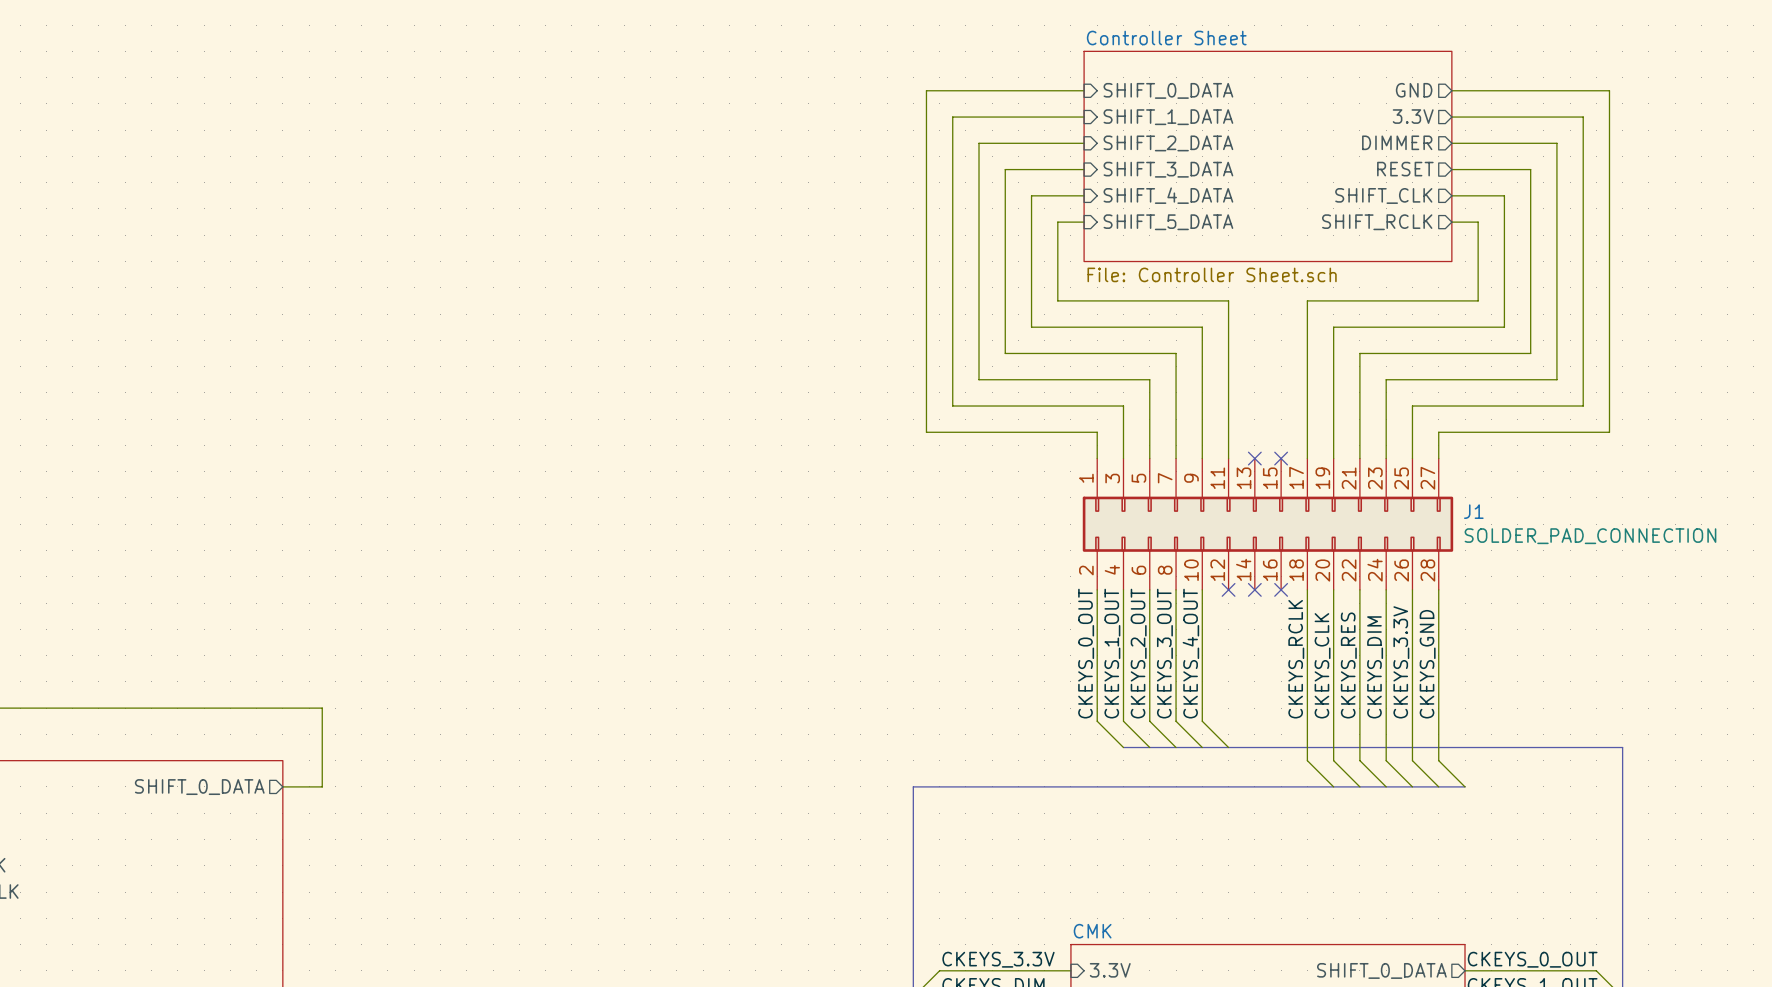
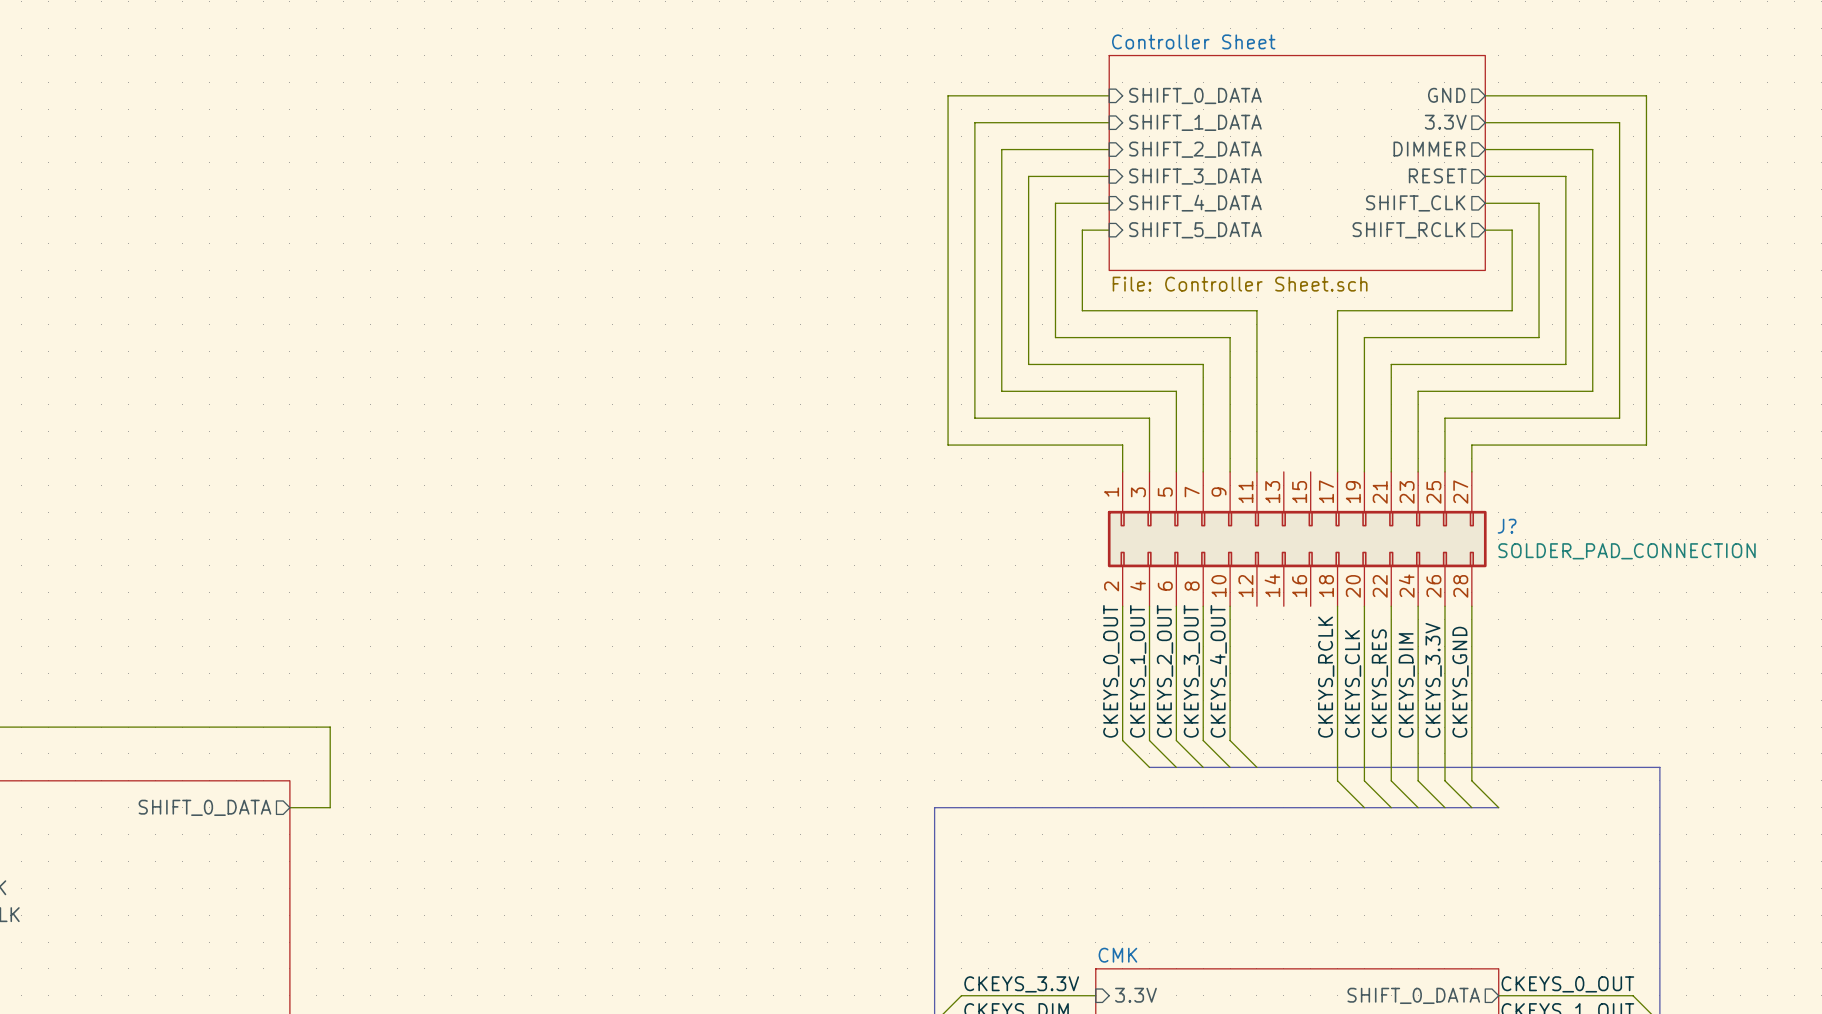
no-connect mark: (1254, 458) -> none
no-connect mark: (1281, 458) -> none
J1 name: J1 (1473, 511) -> J? (1507, 526)
no-connect mark: (1228, 589) -> none
no-connect mark: (1254, 589) -> none
no-connect mark: (1281, 589) -> none

